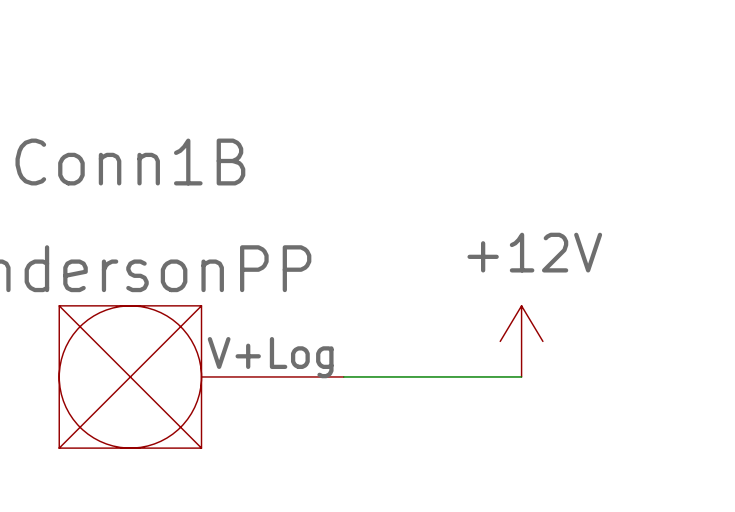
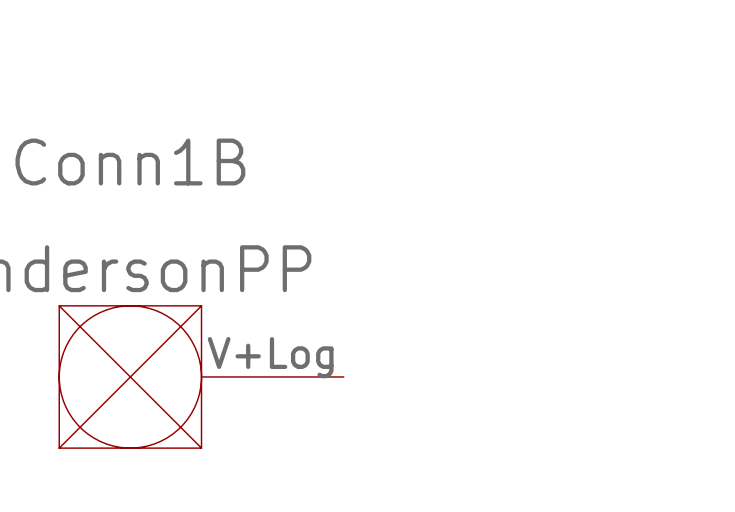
power symbol: +12V (521, 341) -> none
wire: (343, 376) (521, 376) -> none

